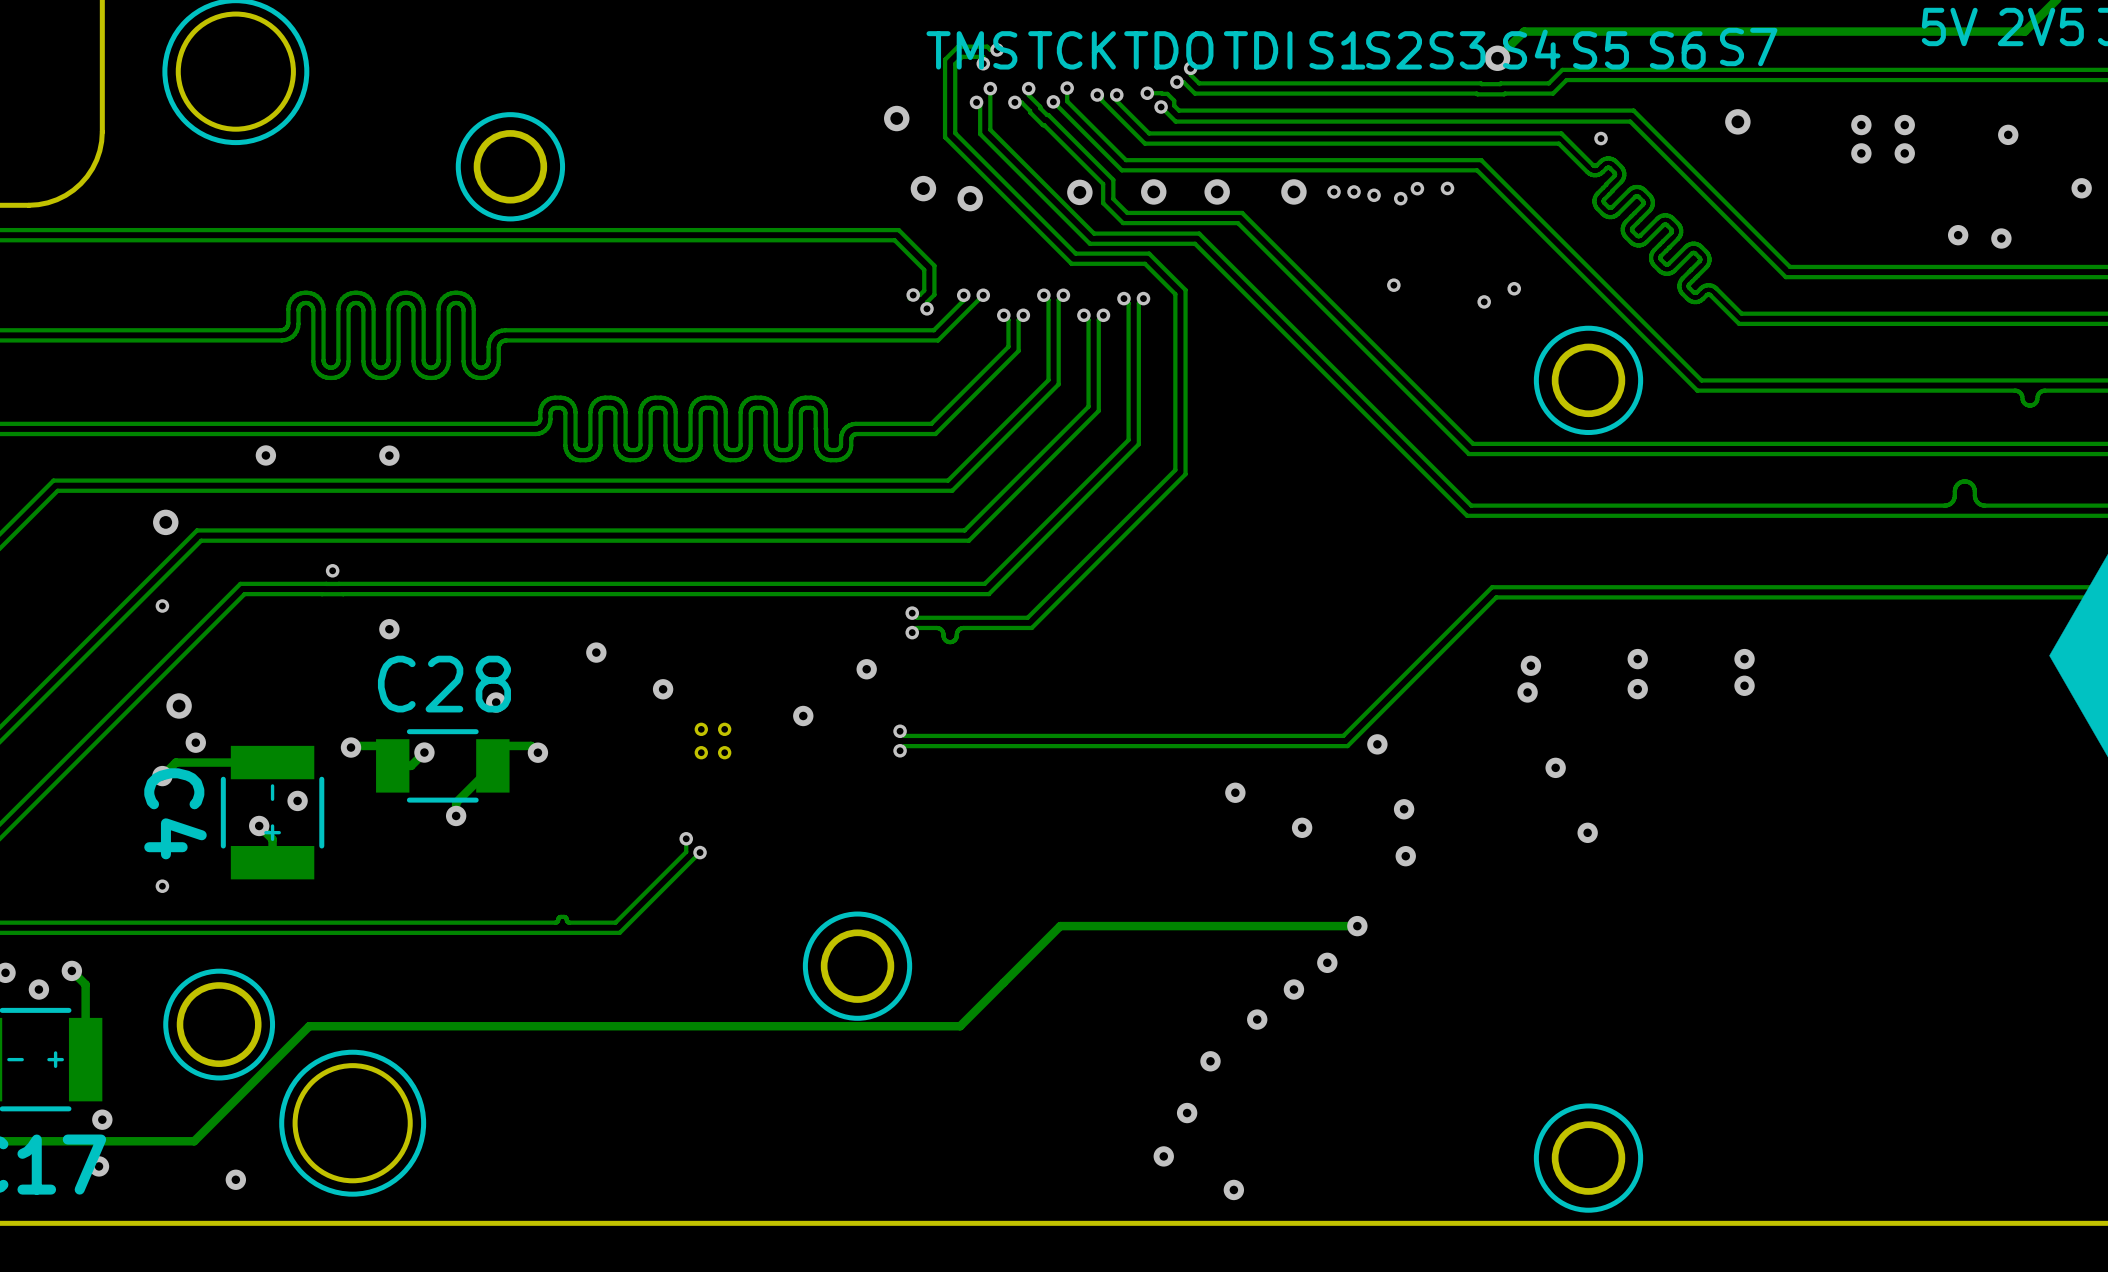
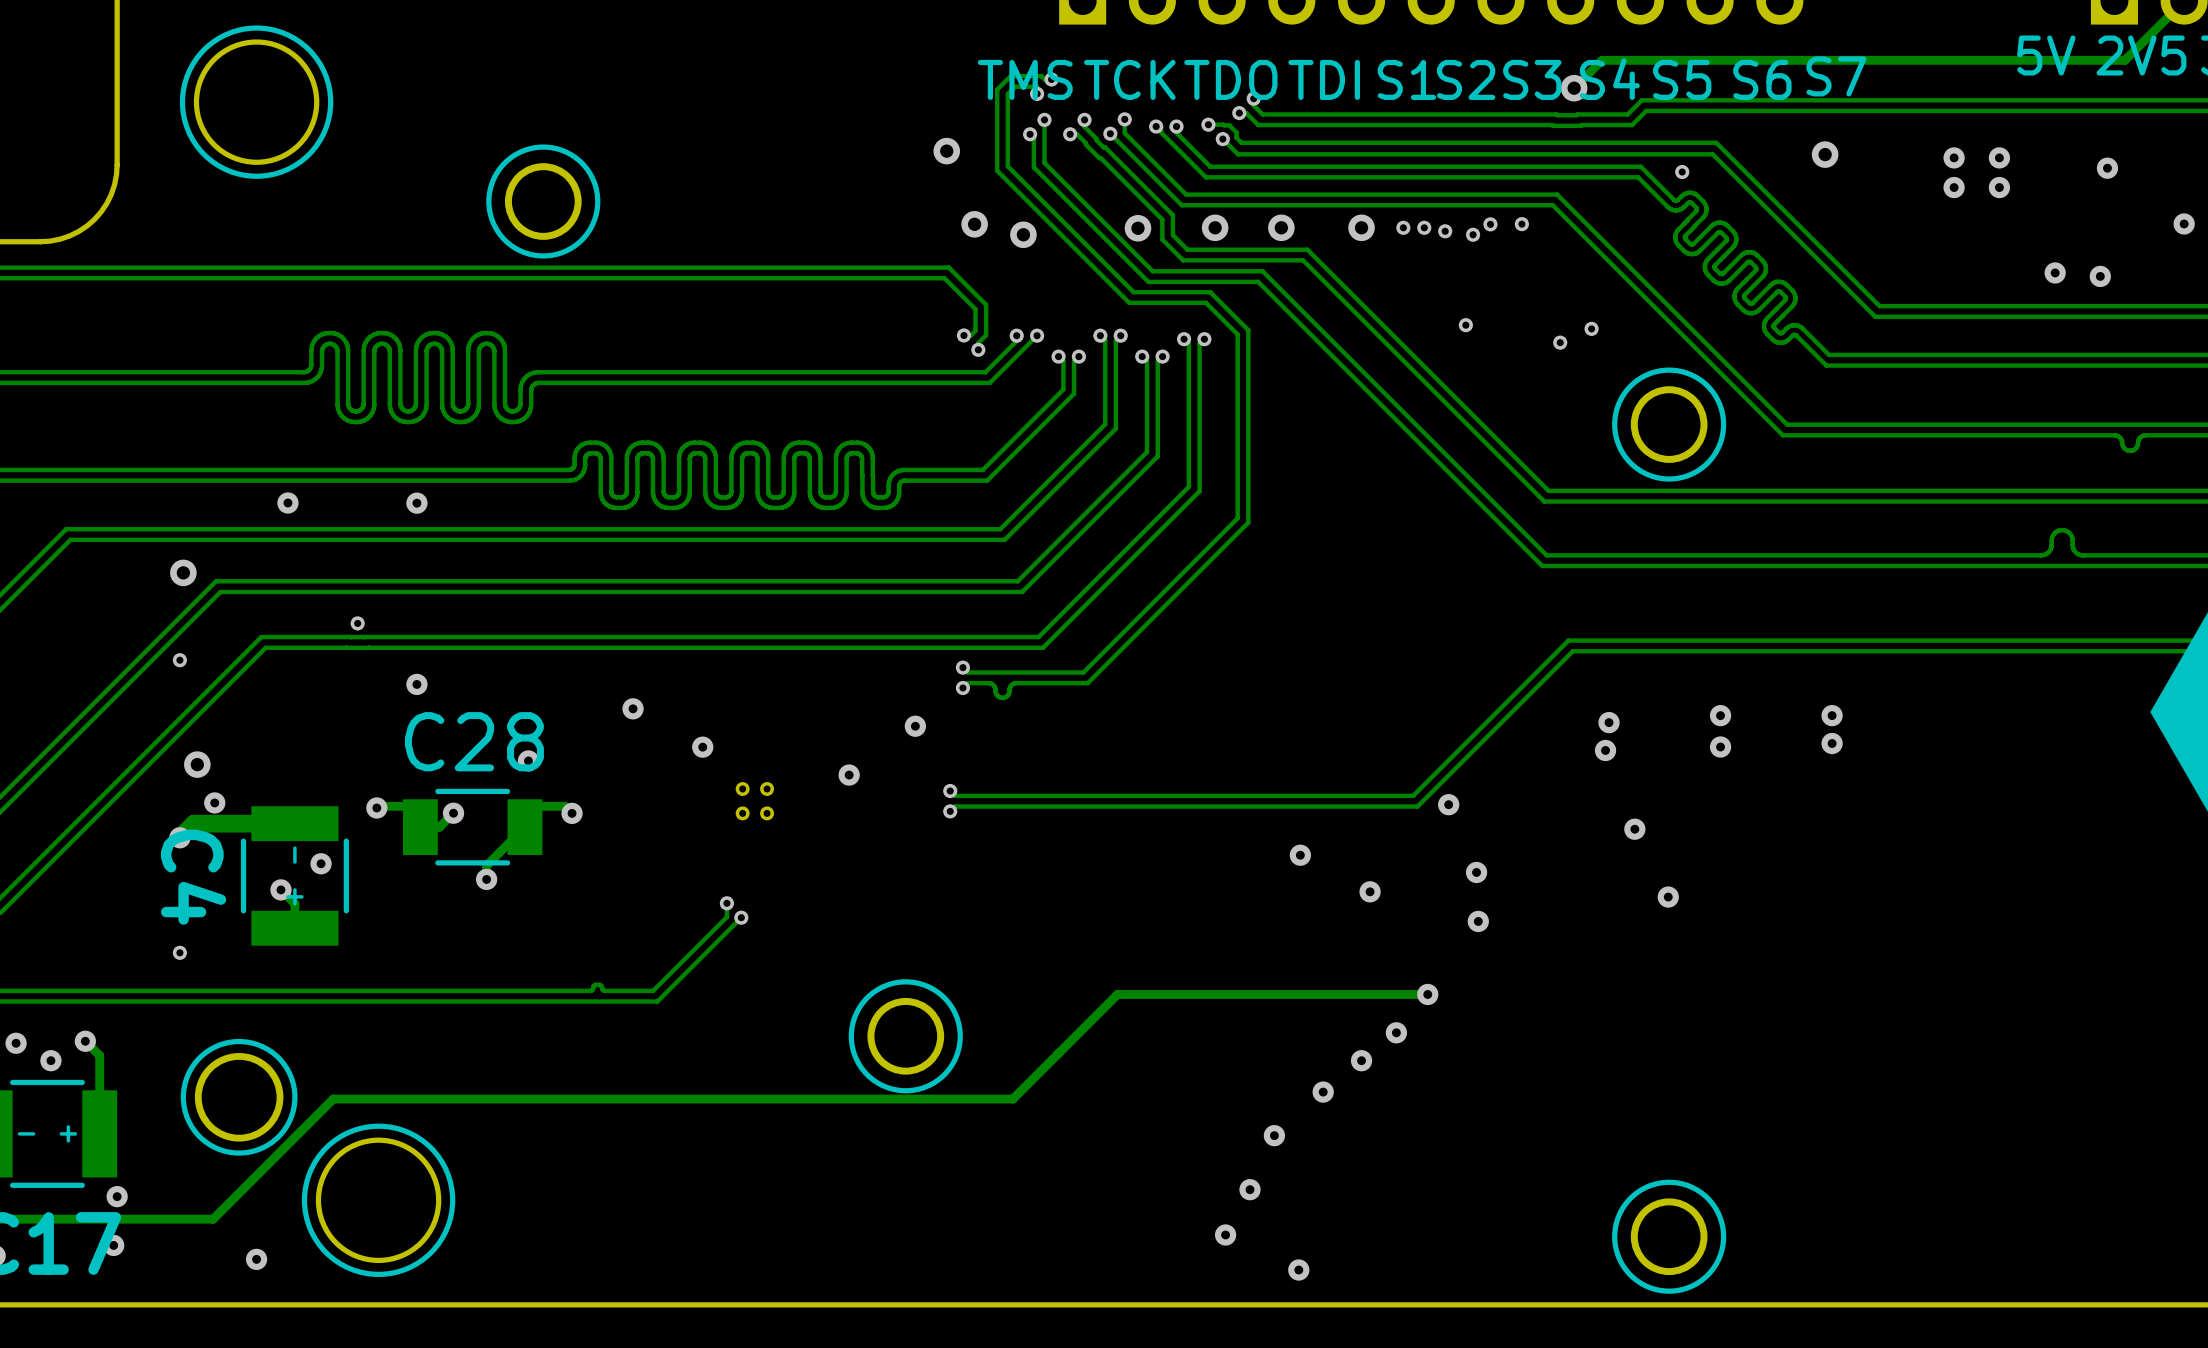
track width: thin (272, 762) (175, 762) (162, 776) -> thick (294, 823) (194, 823) (179, 837)

